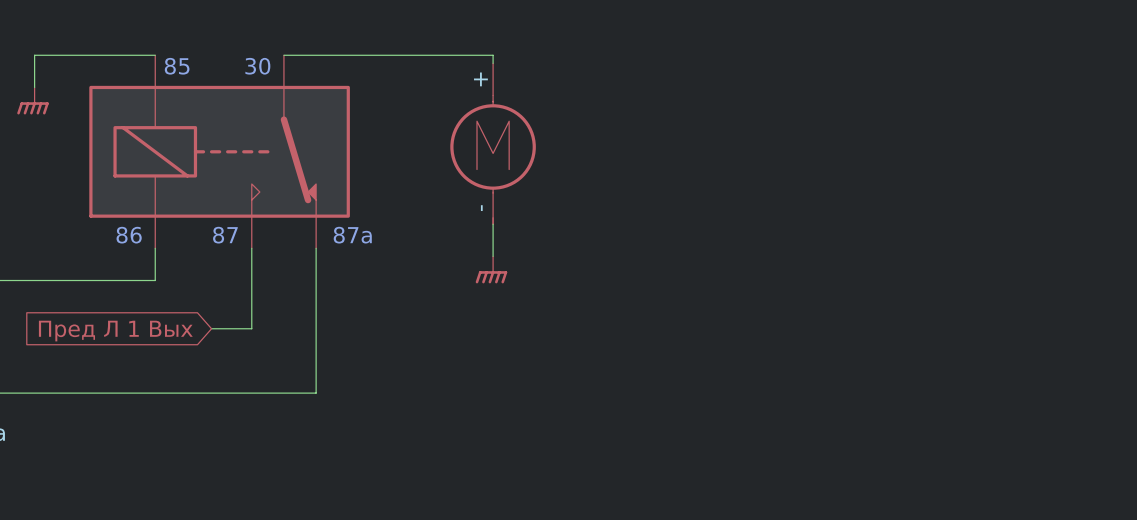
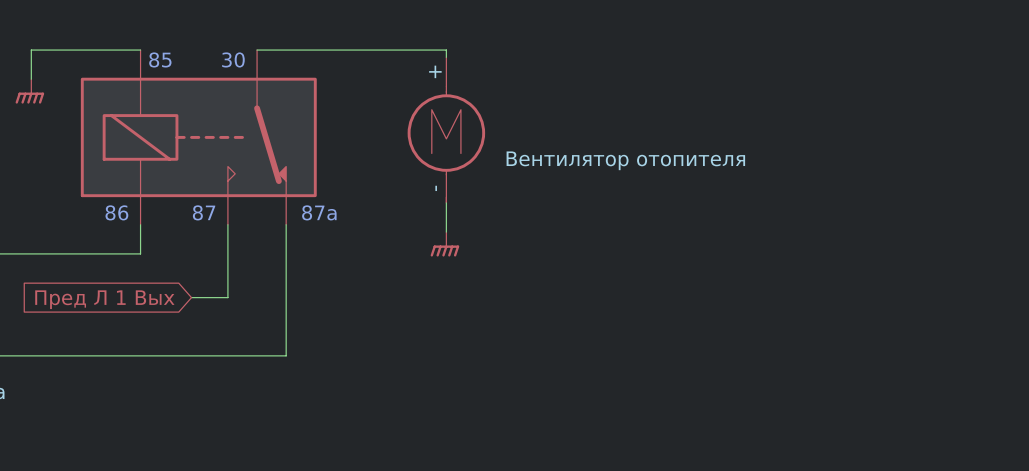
part value: none -> Вентилятор отопителя (625, 160)

